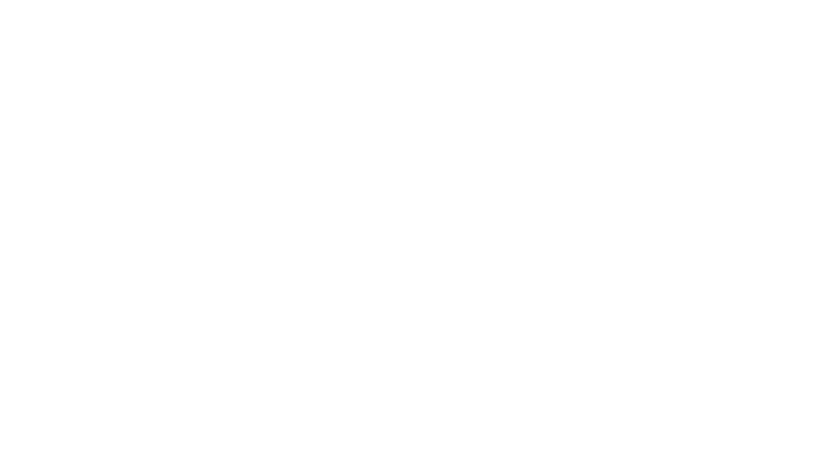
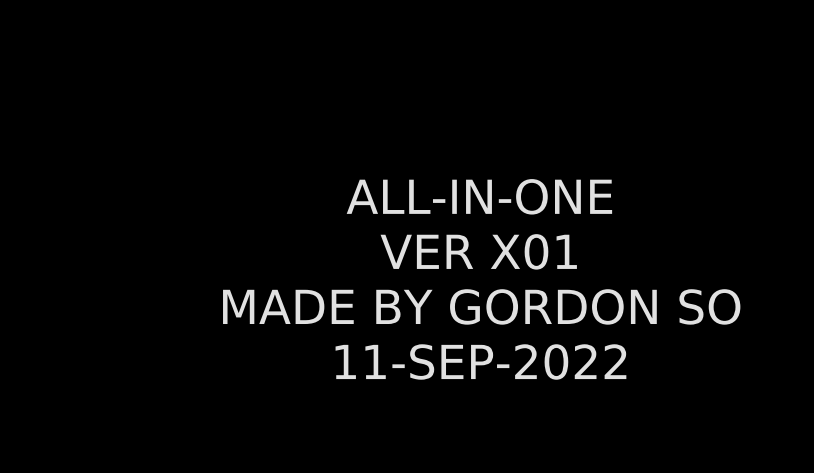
text: none -> ALL-IN-ONE (479, 196)
text: none -> VER X01 (478, 251)
text: none -> MADE BY GORDON SO (481, 306)
text: none -> 11-SEP-2022 (480, 361)

